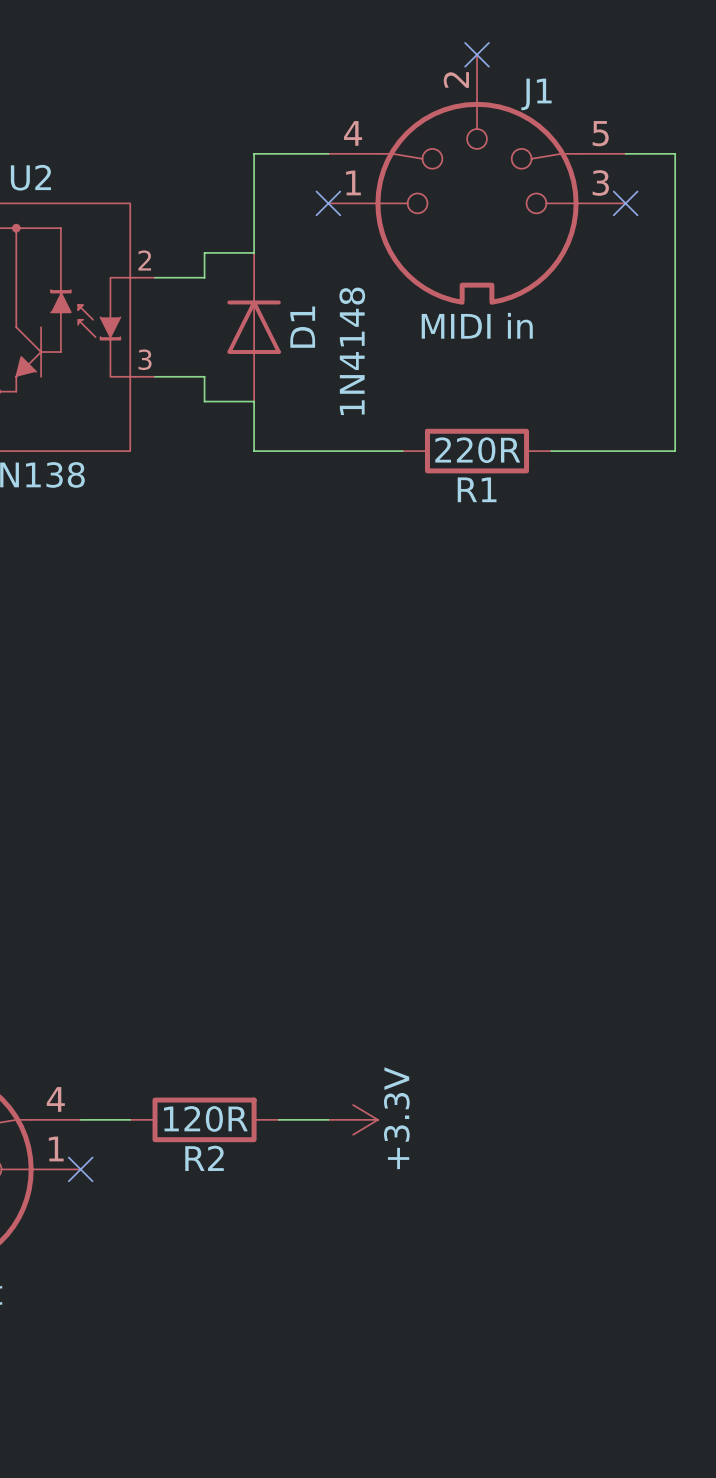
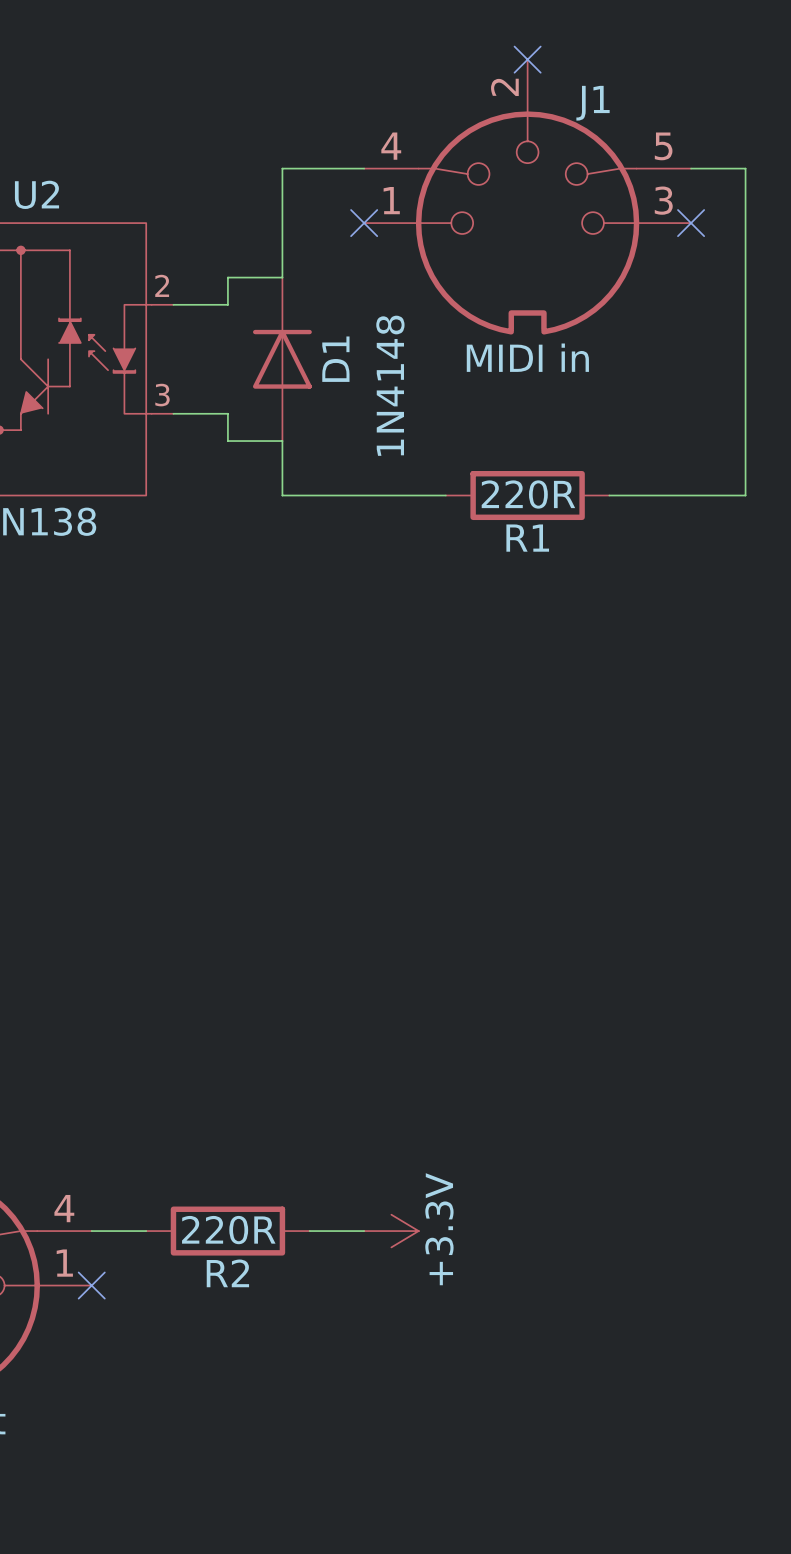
R2 value: 120R (205, 1118) -> 220R (228, 1230)

